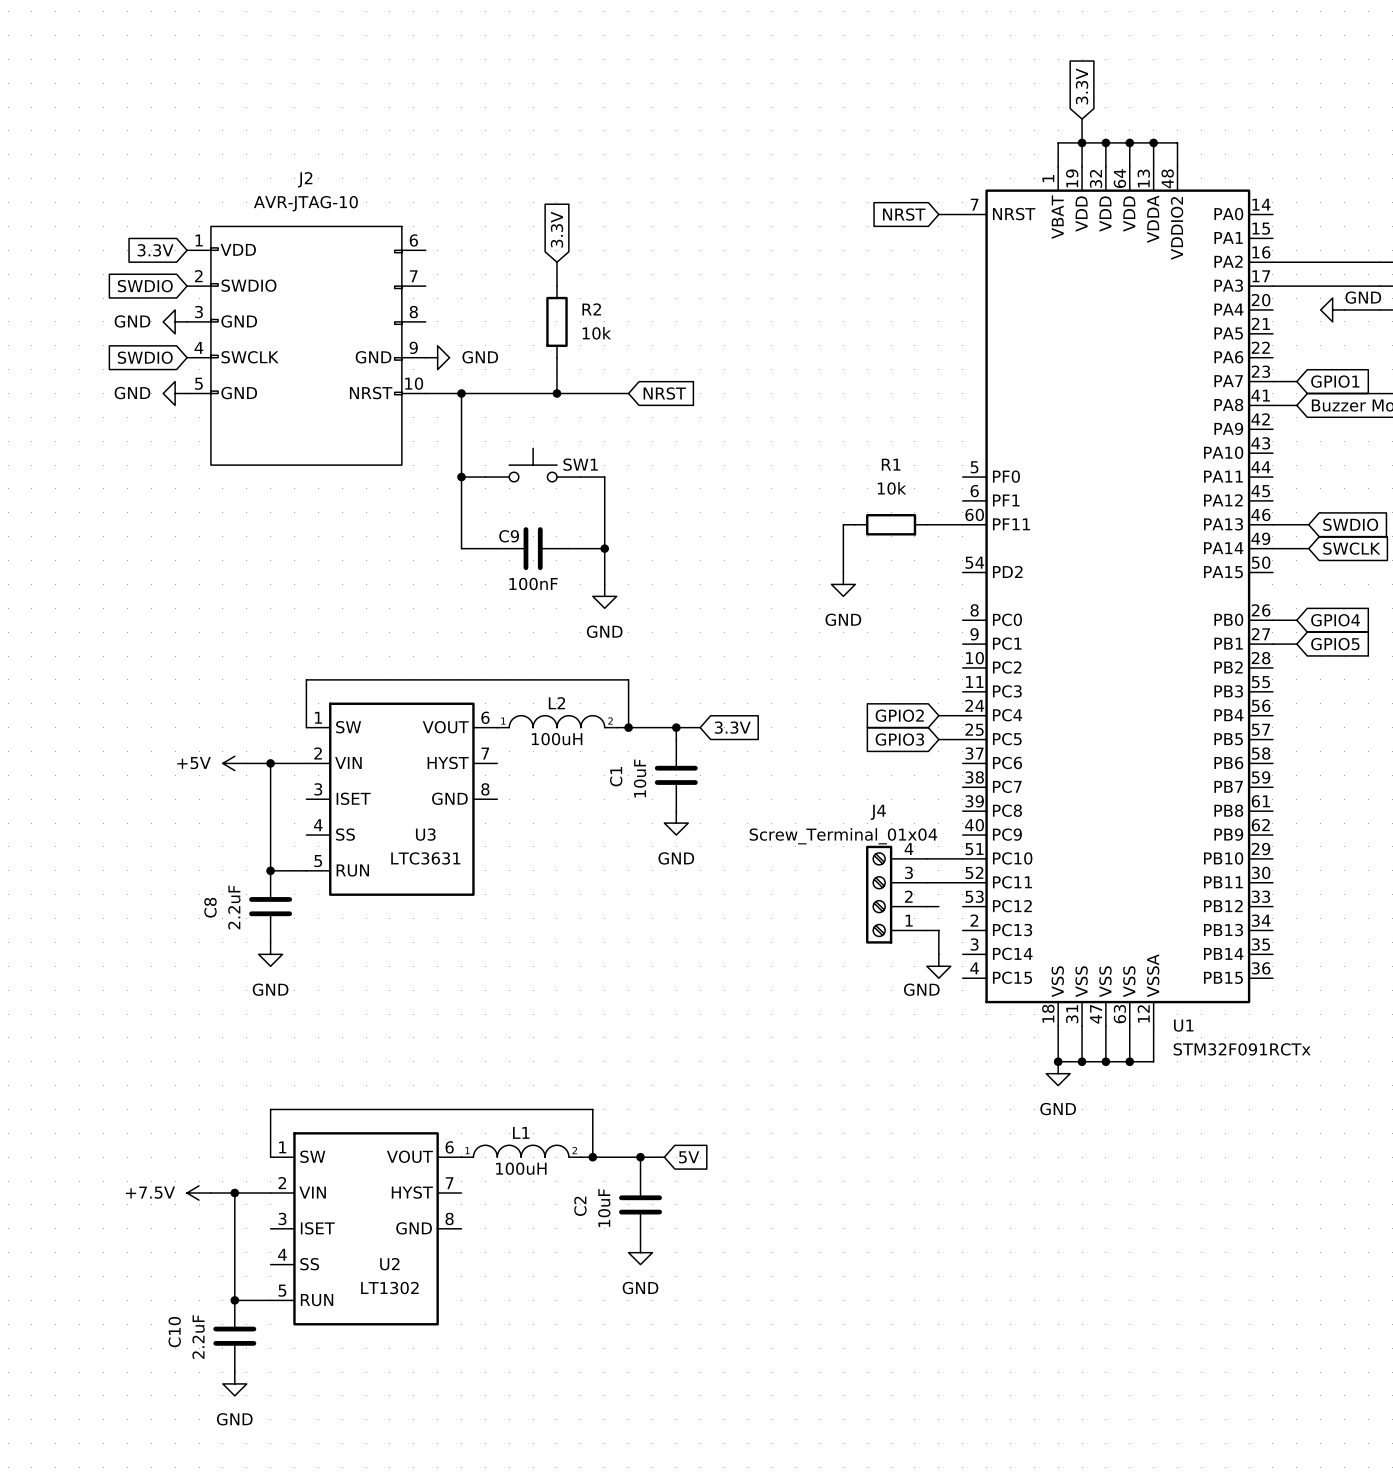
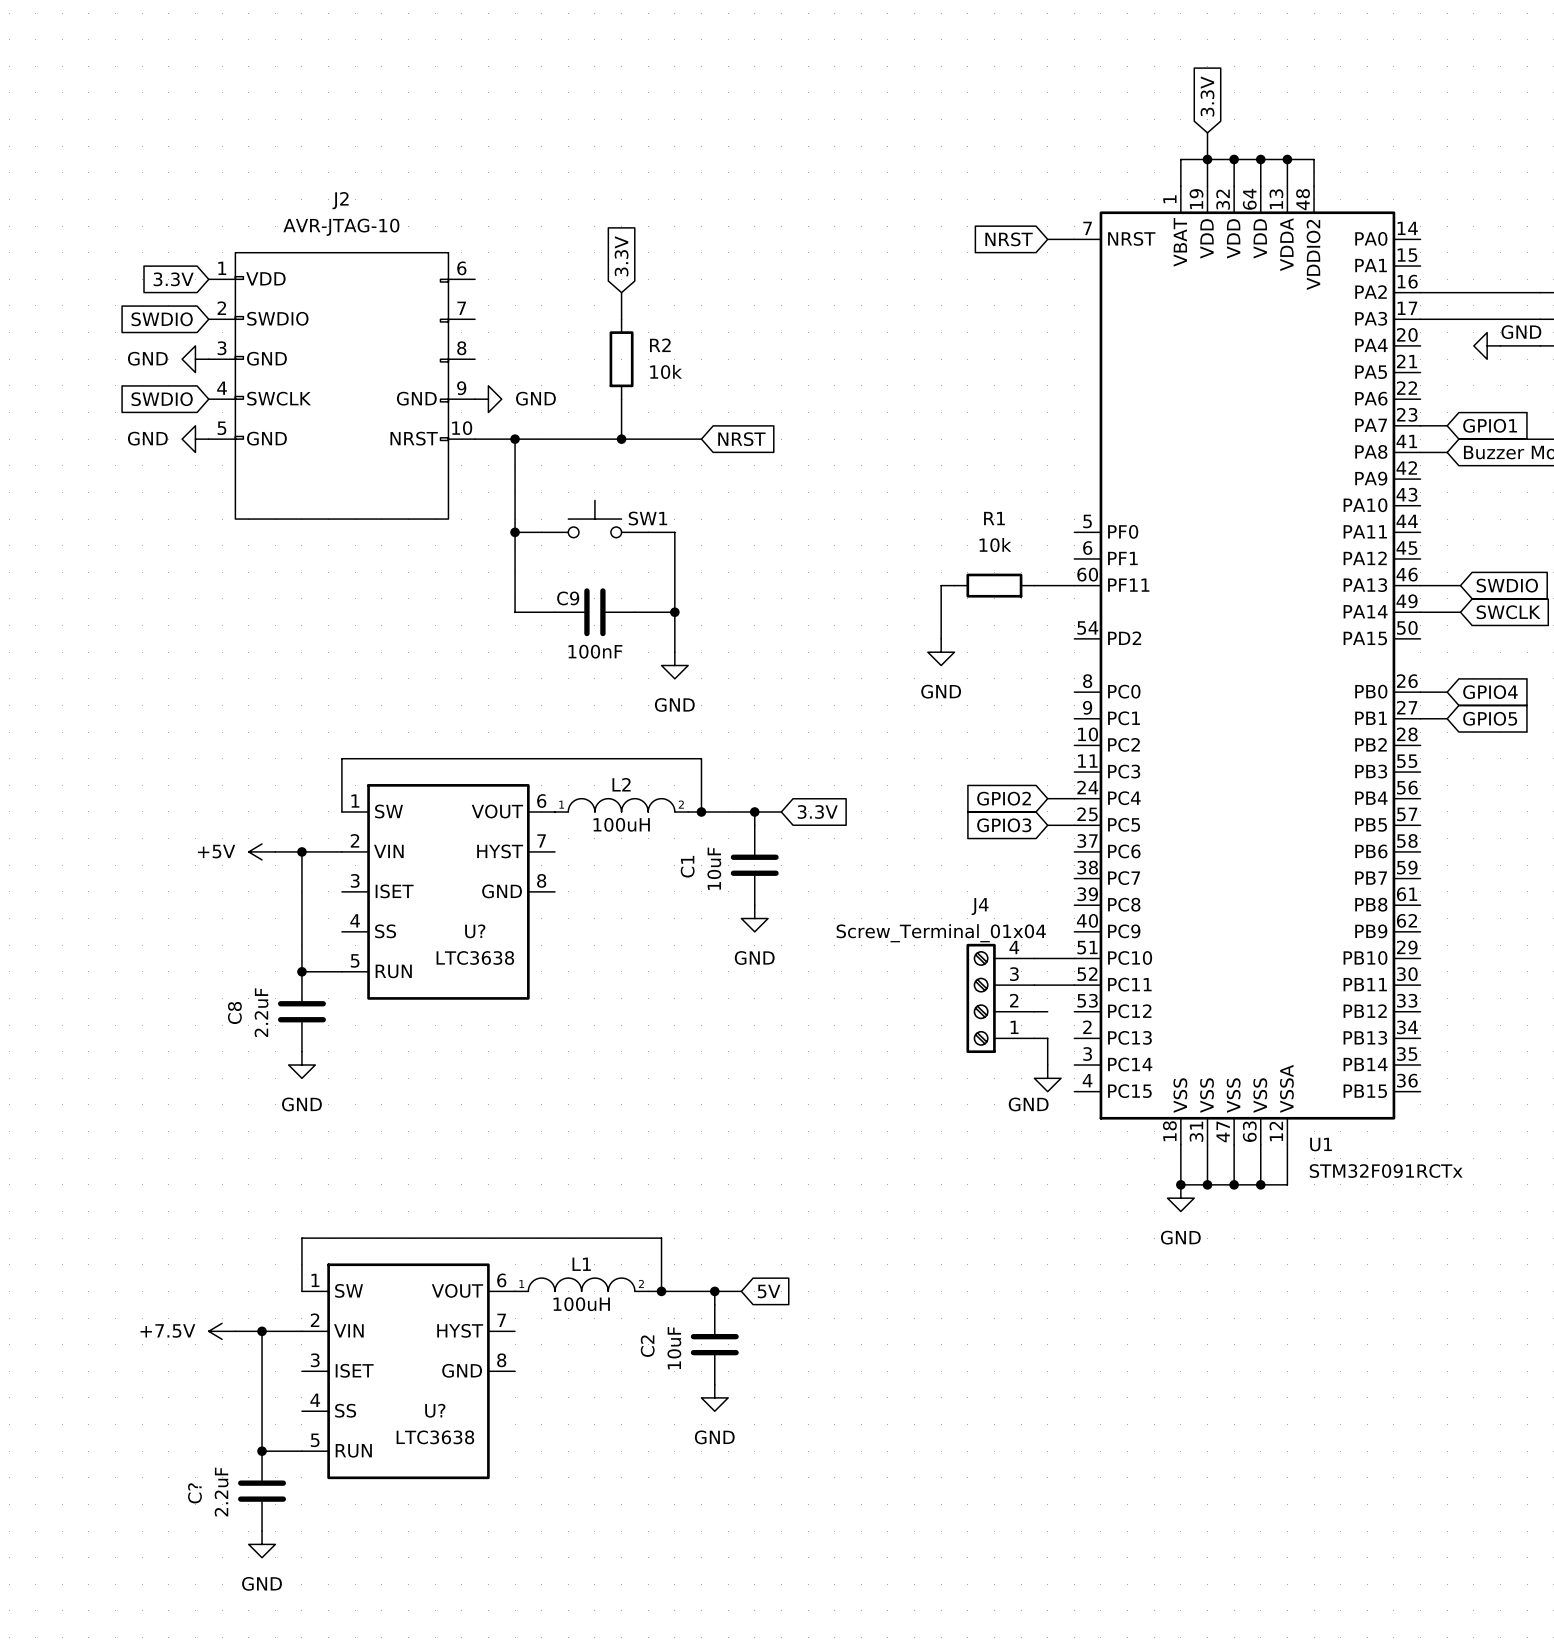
U3 name: U3 (425, 834) -> U? (475, 931)
U3 value: LTC3631 (425, 858) -> LTC3638 (475, 957)
U2 name: U2 (389, 1264) -> U? (435, 1410)
U2 value: LT1302 (389, 1288) -> LTC3638 (435, 1437)
C10 name: C10 (174, 1332) -> C? (194, 1493)

